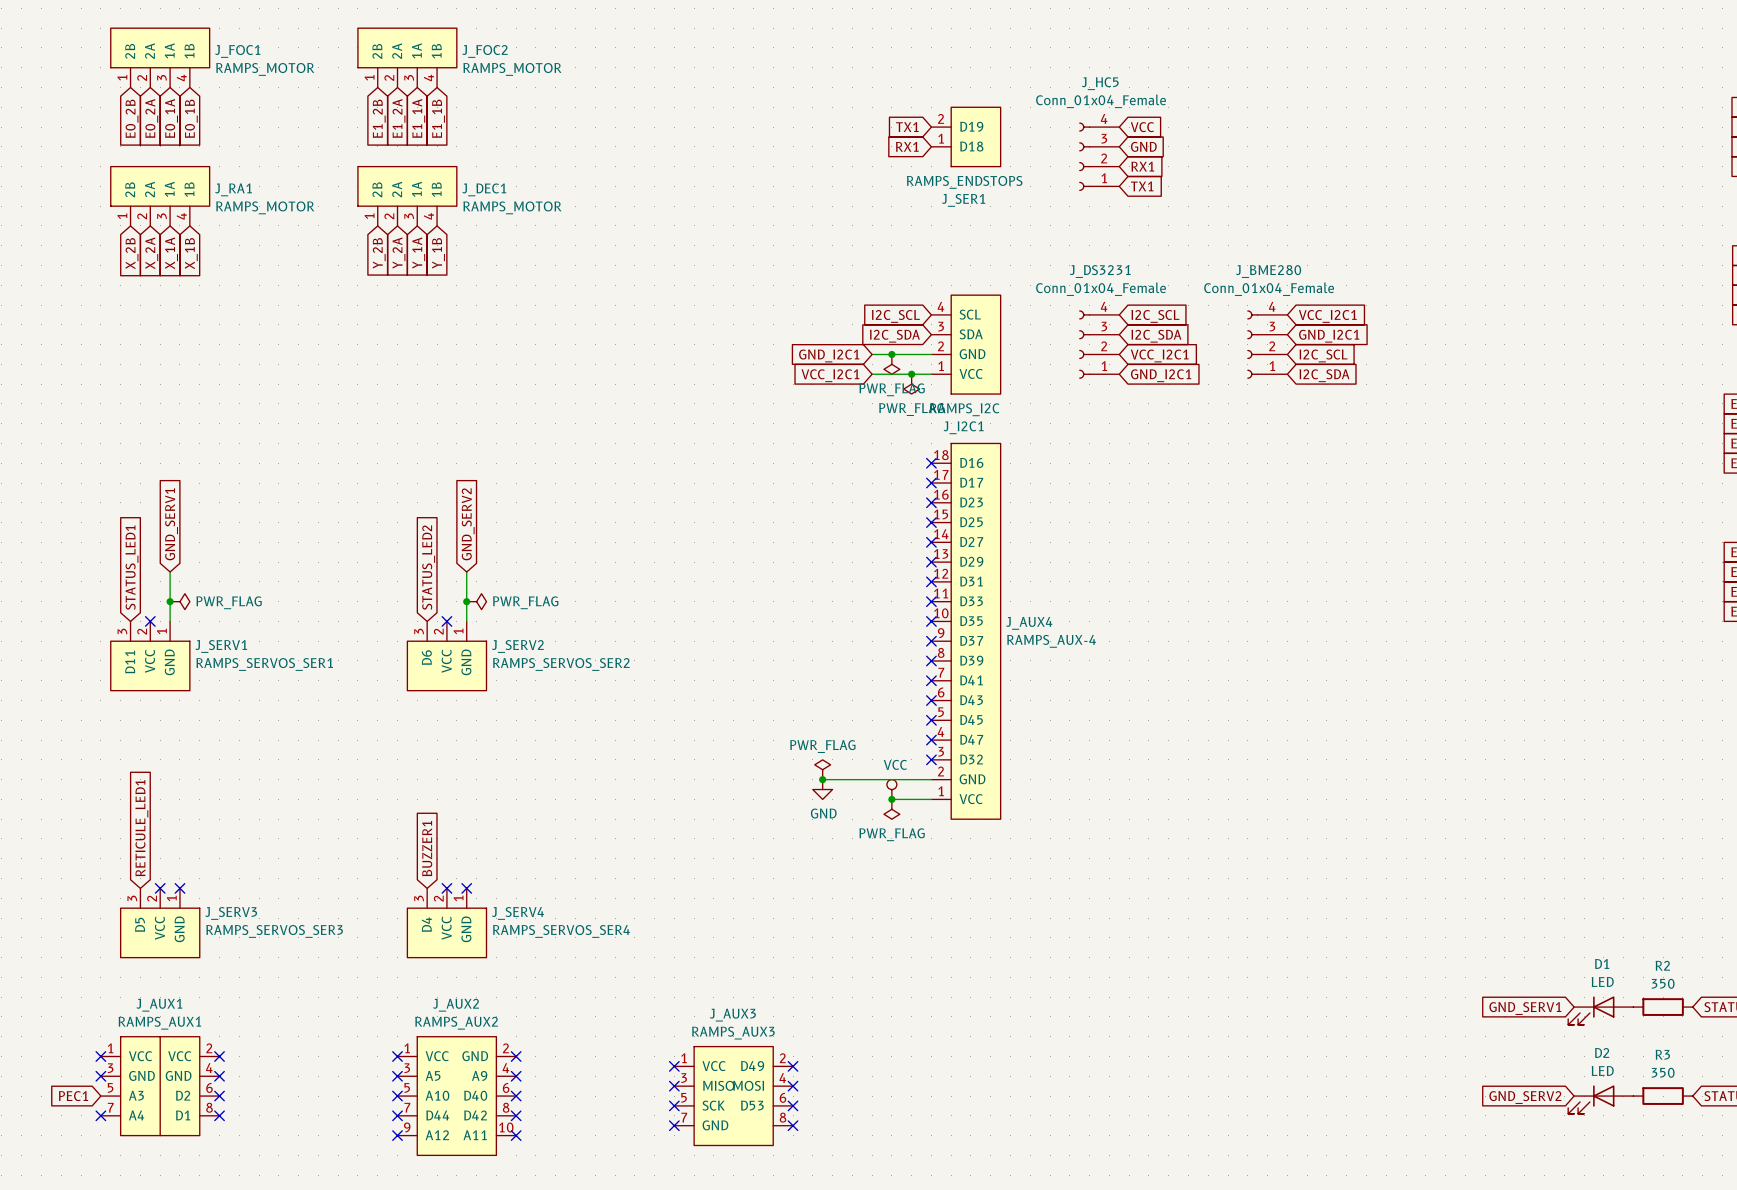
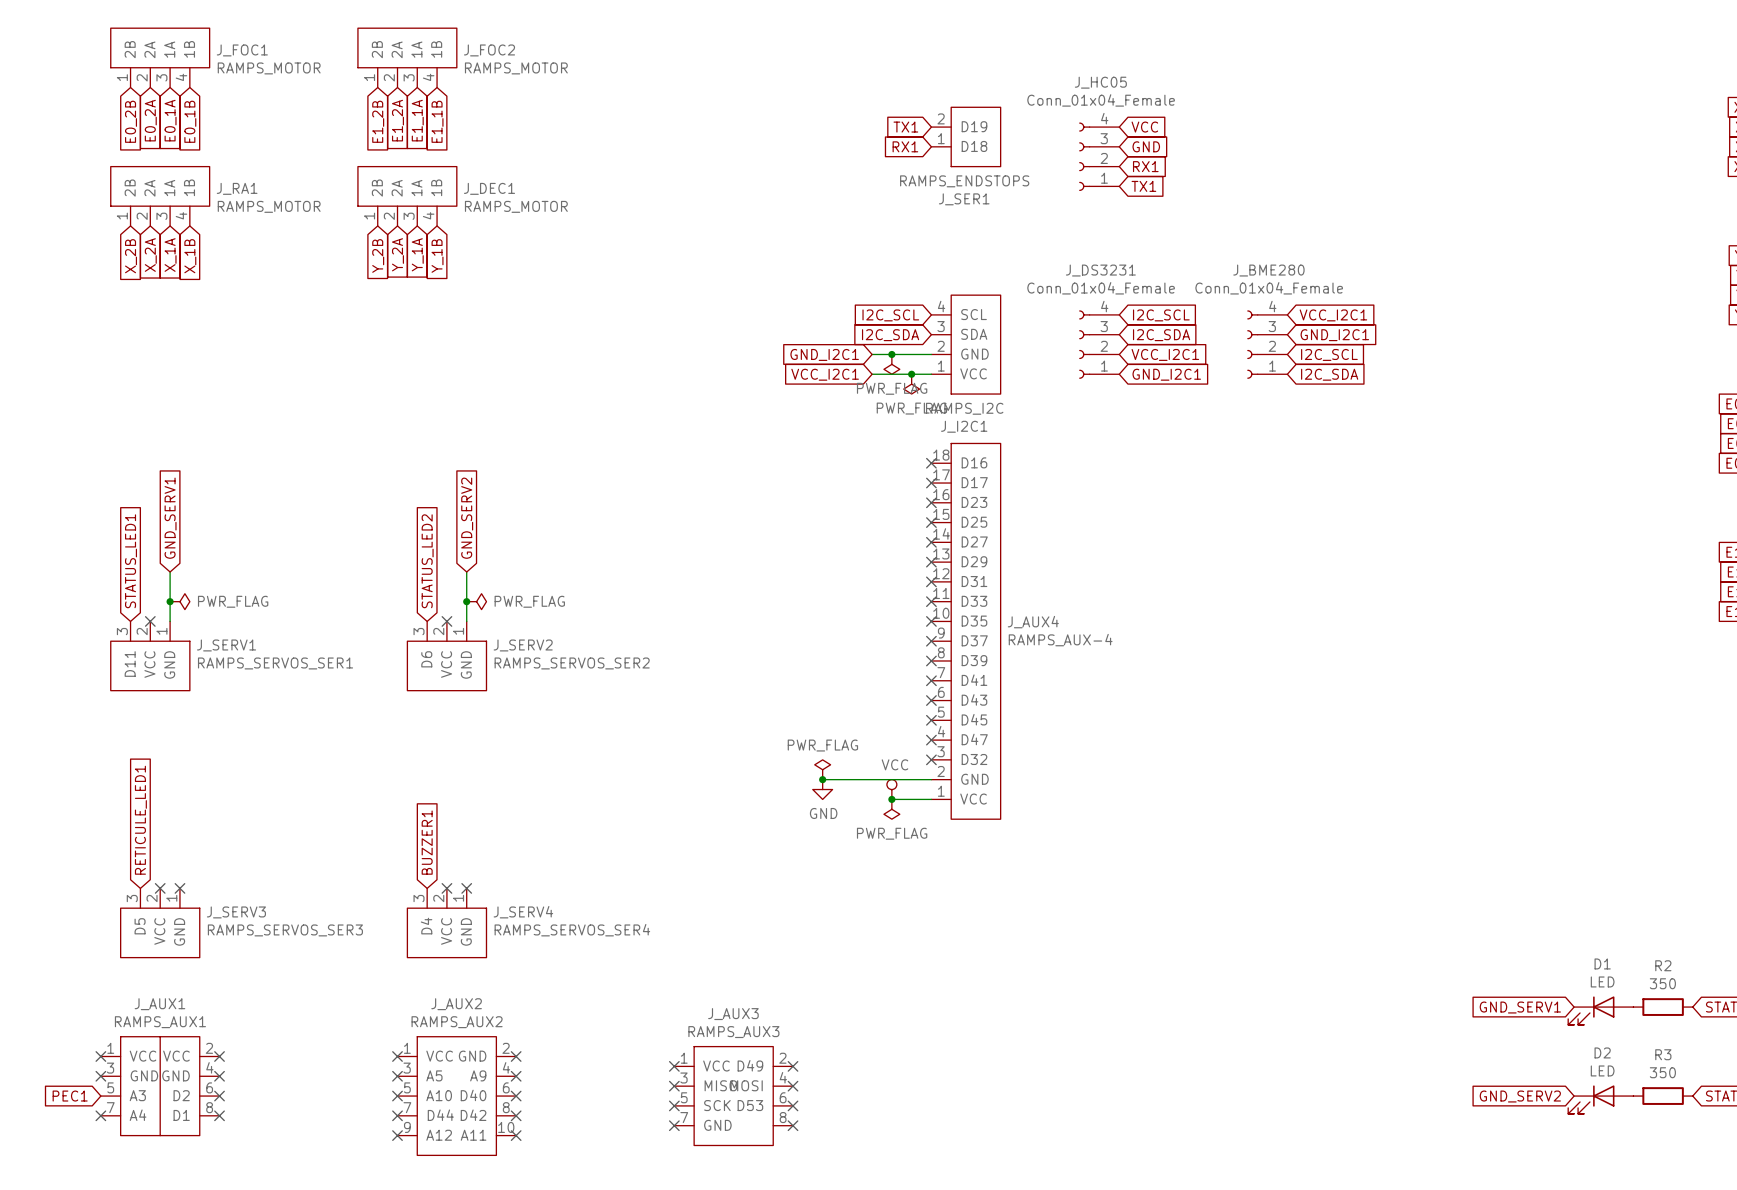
J_HC5 name: J_HC5 (1100, 83) -> J_HC05 (1100, 82)

